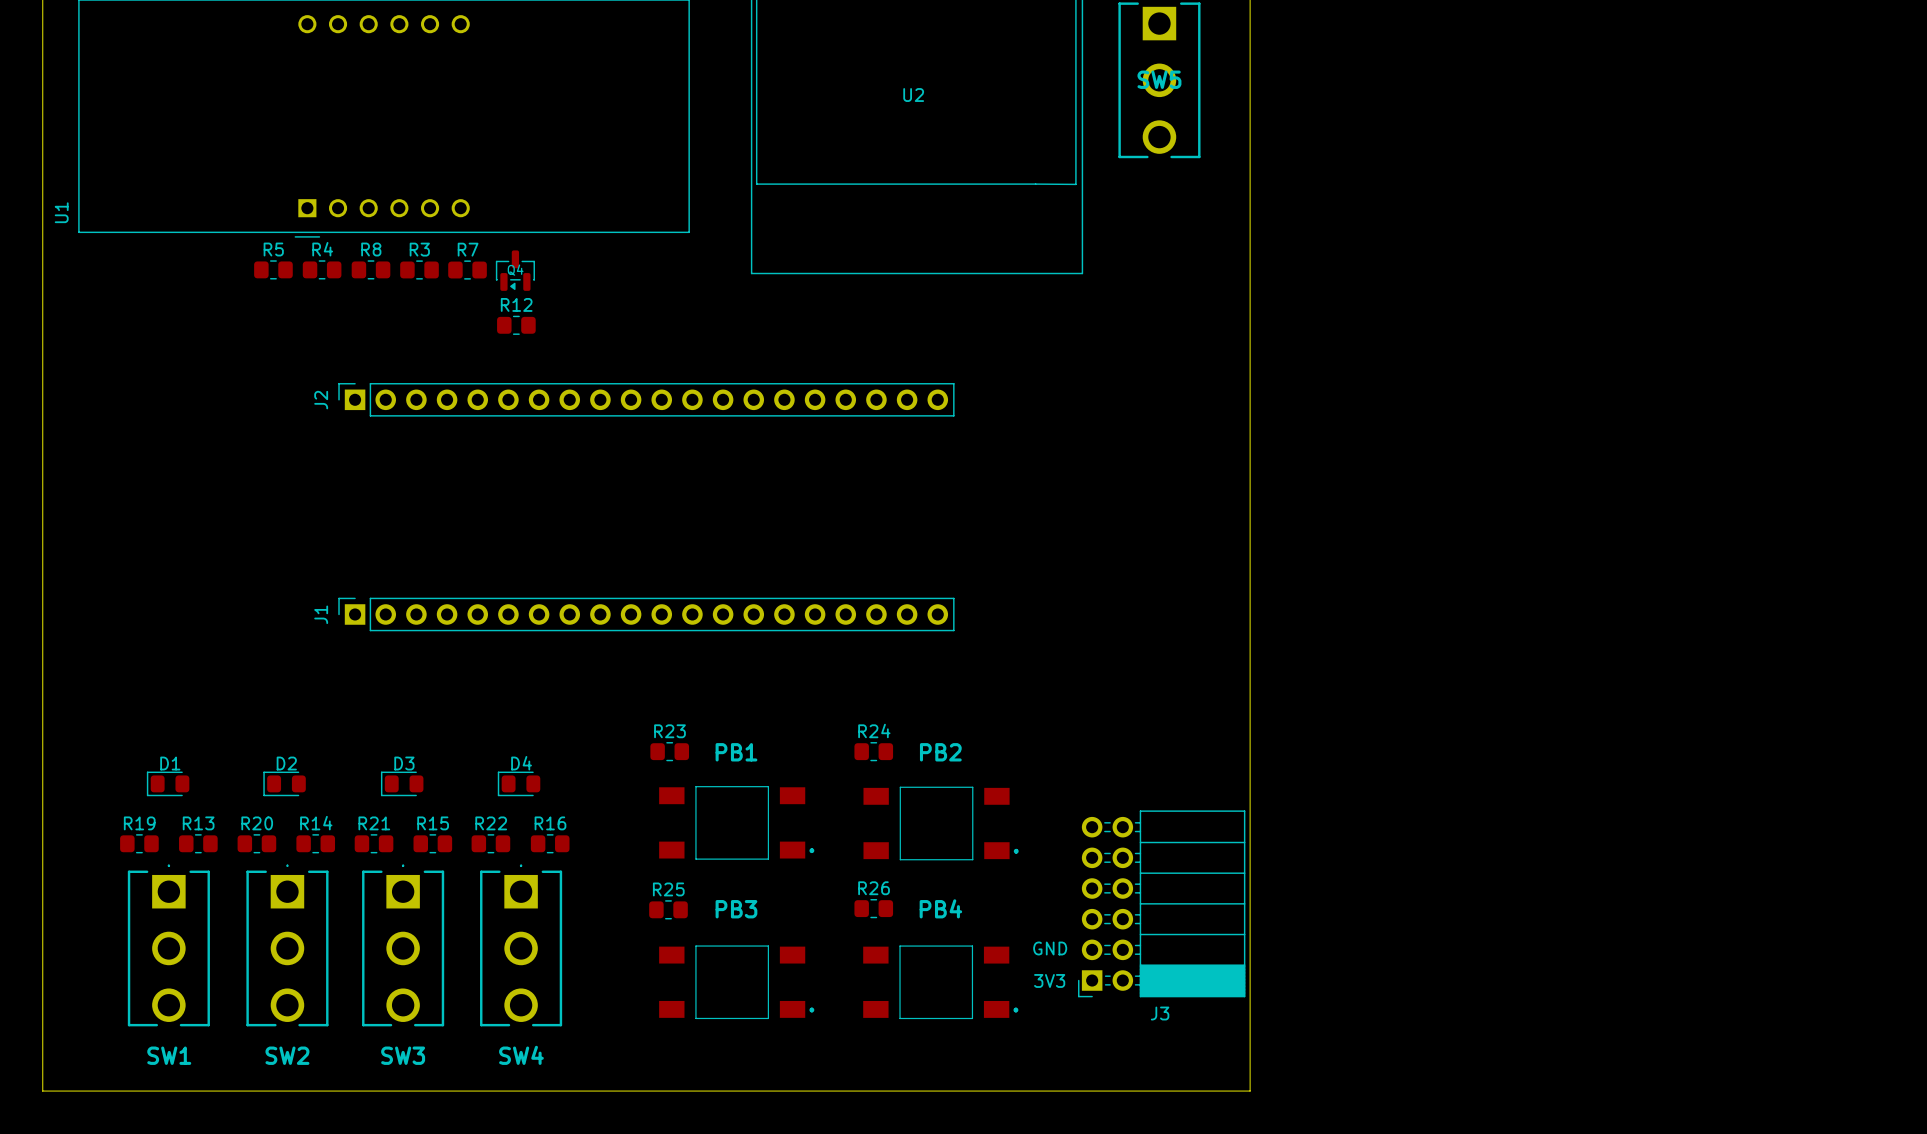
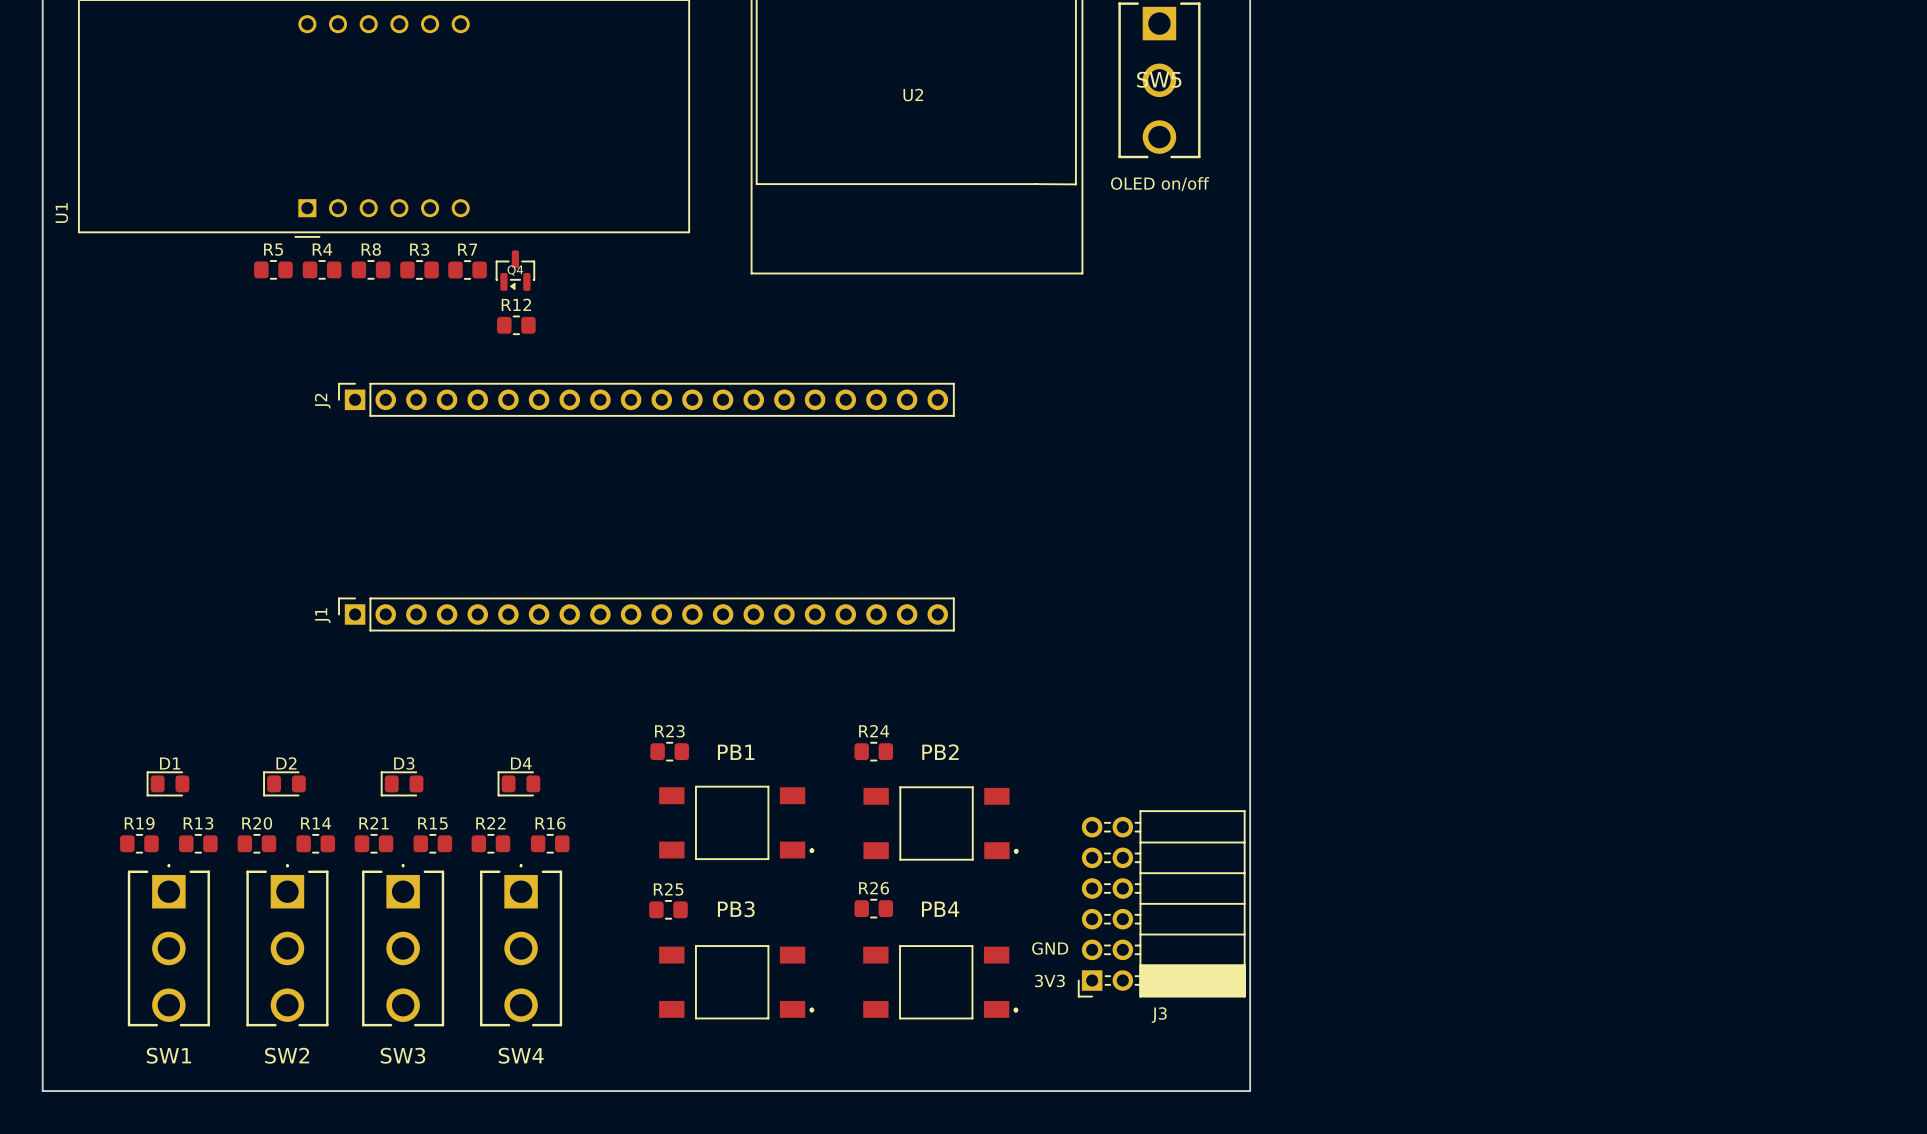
text: none -> OLED on/off (1160, 184)

